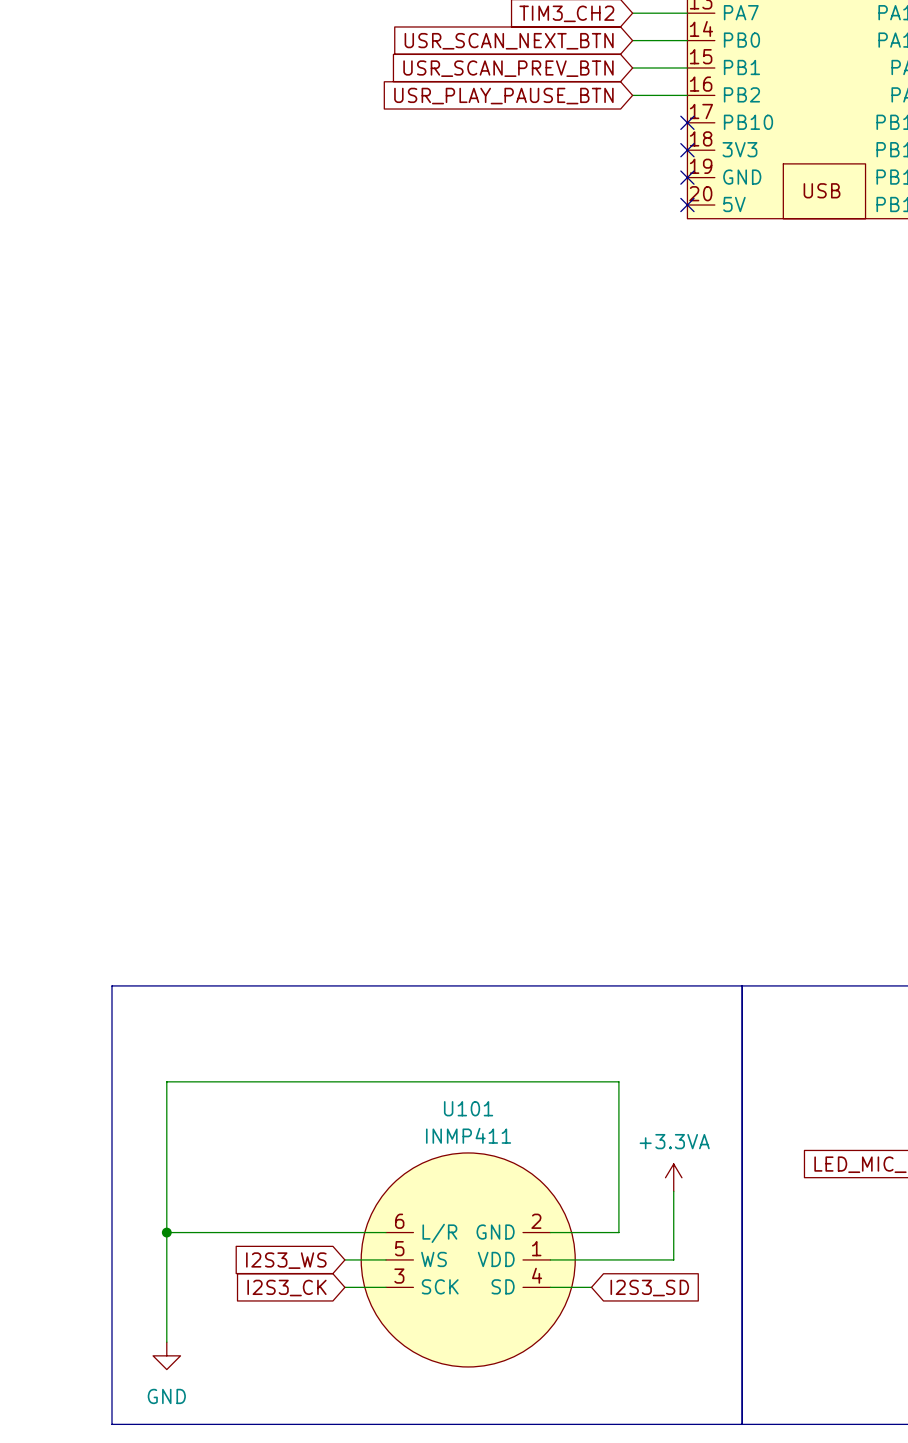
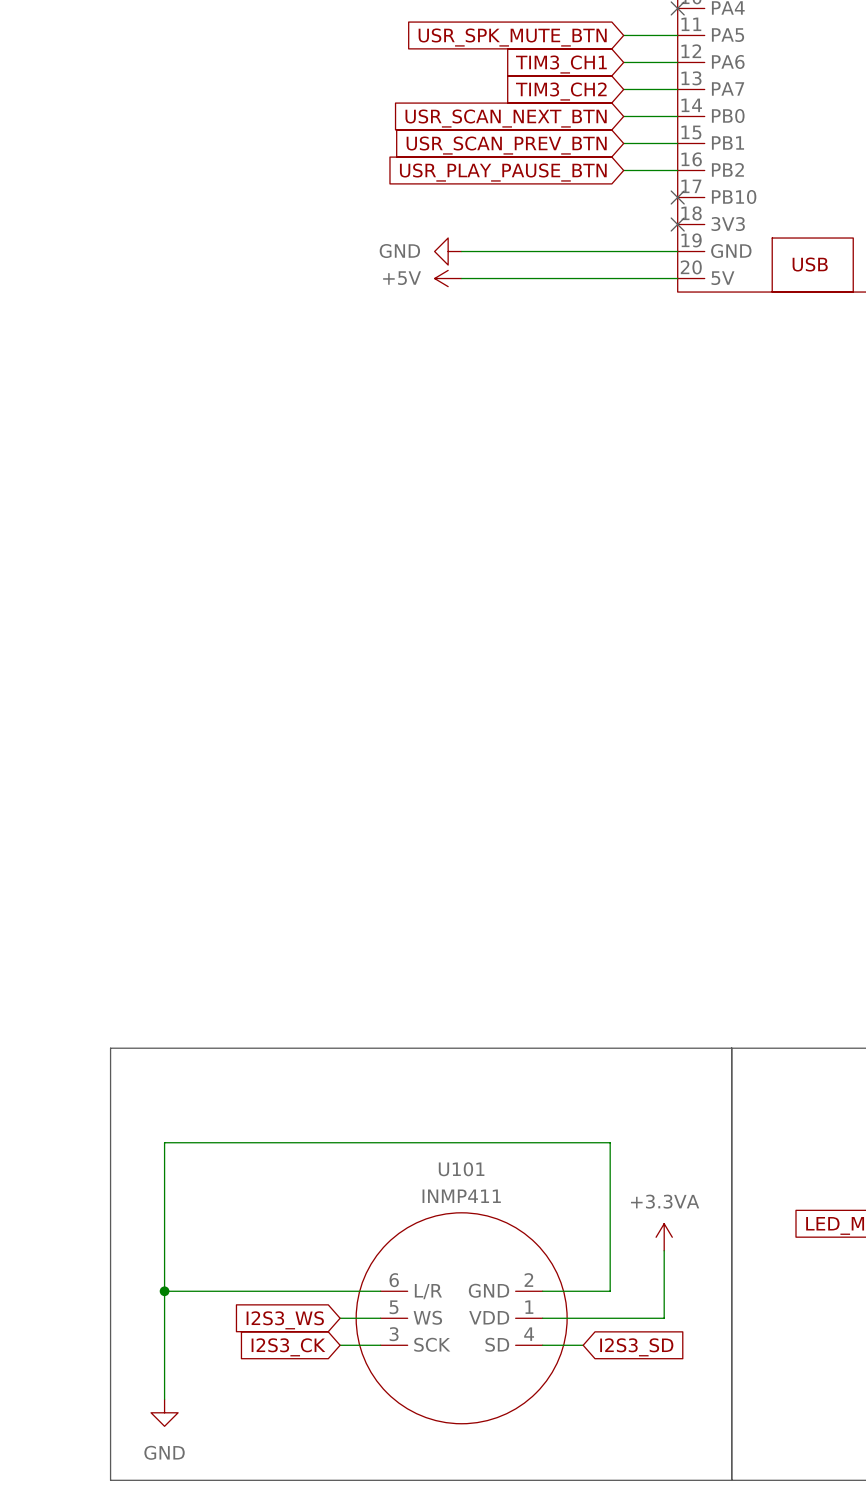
power symbol: none -> GND (448, 251)
wire: none -> (461, 251) (677, 251)
no-connect mark: (687, 177) -> none
power symbol: none -> +5V (448, 278)
wire: none -> (461, 278) (677, 278)
no-connect mark: (687, 205) -> none

